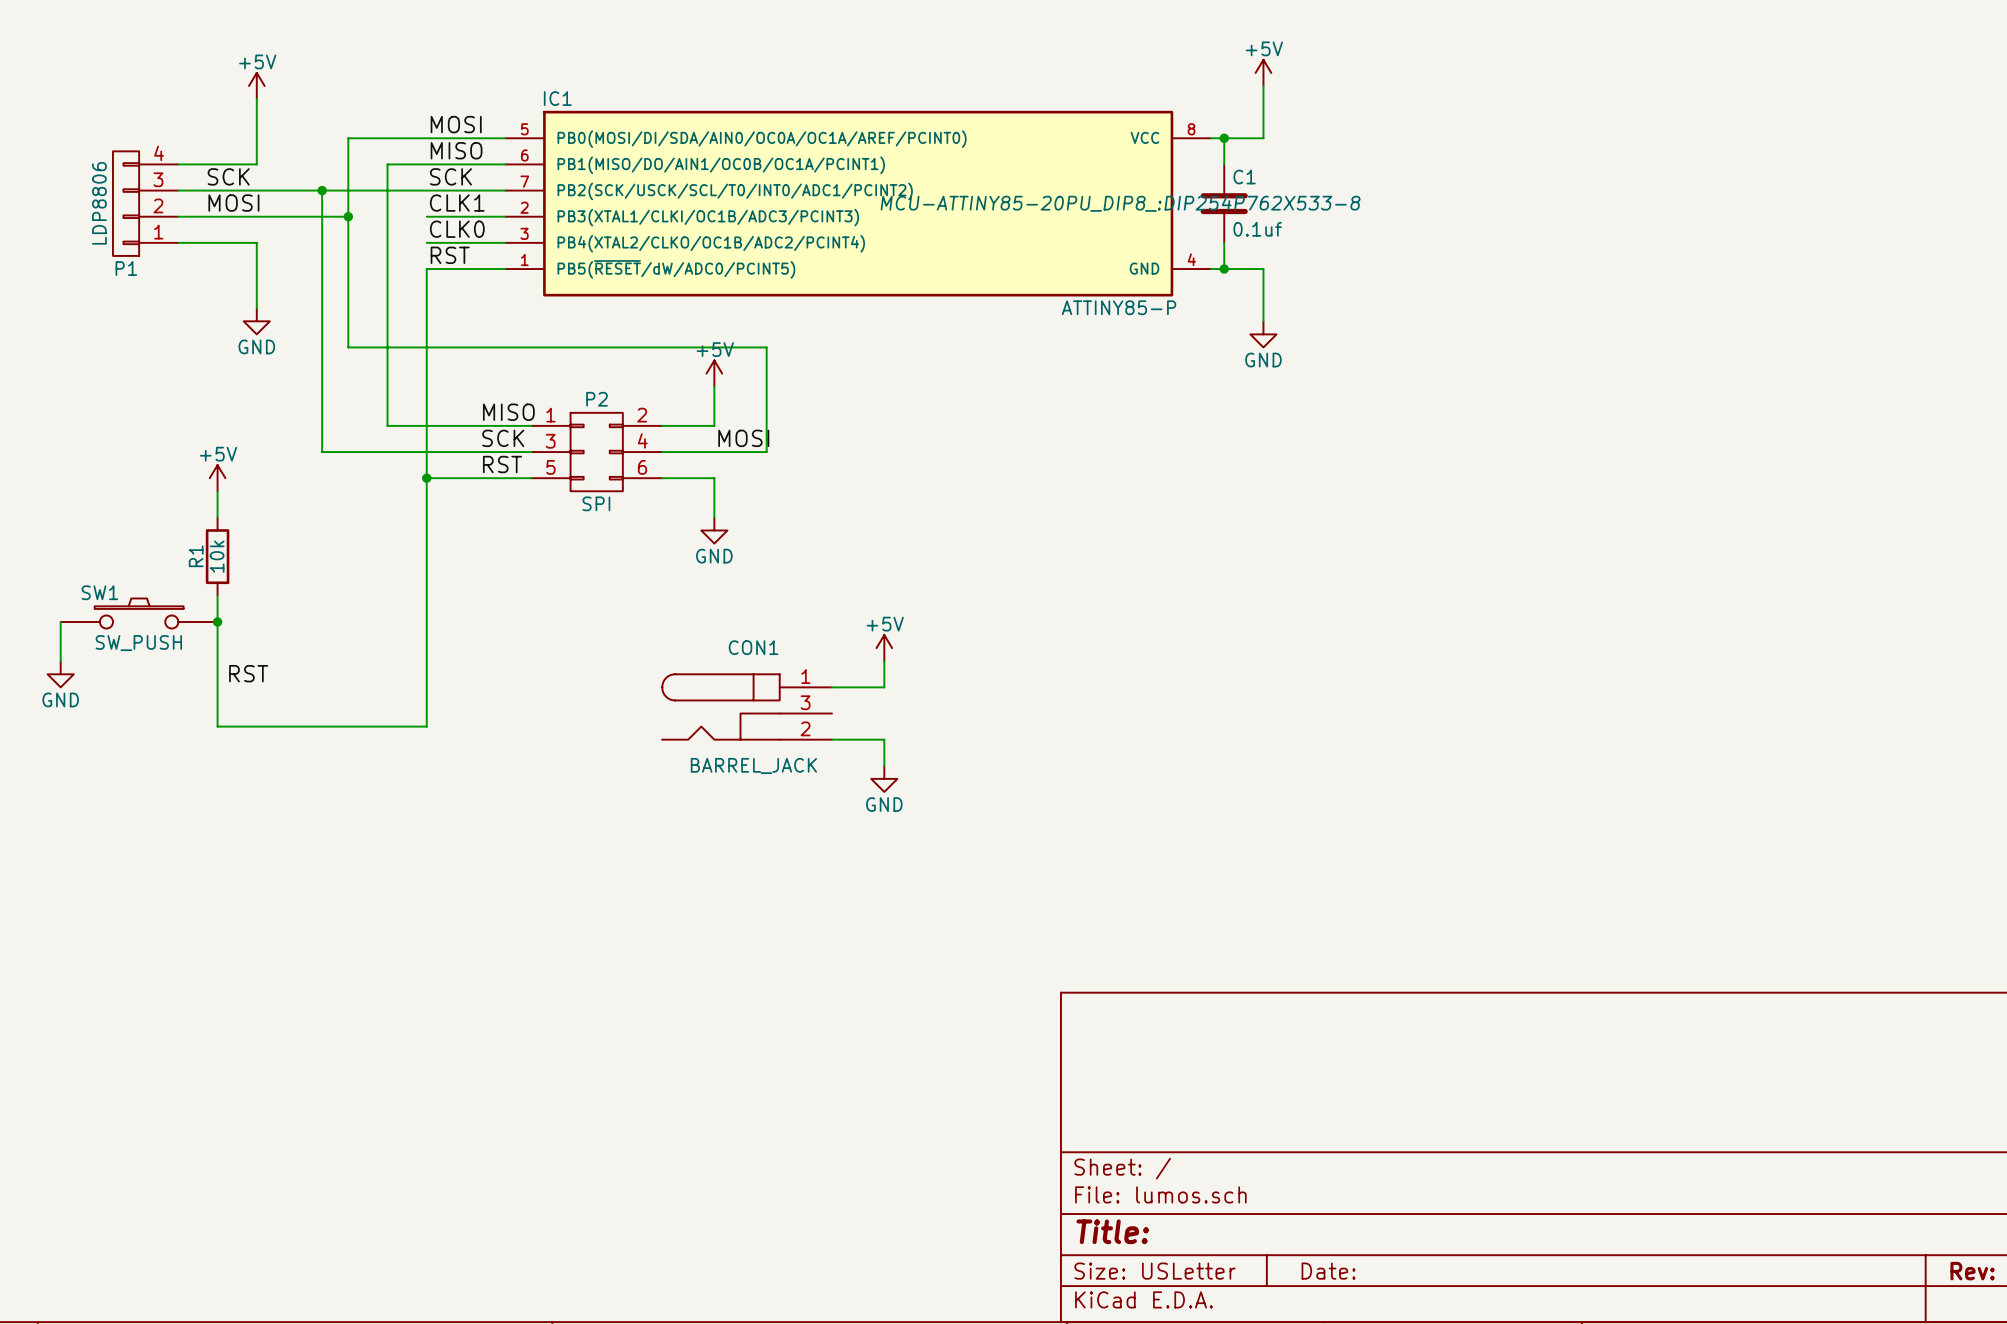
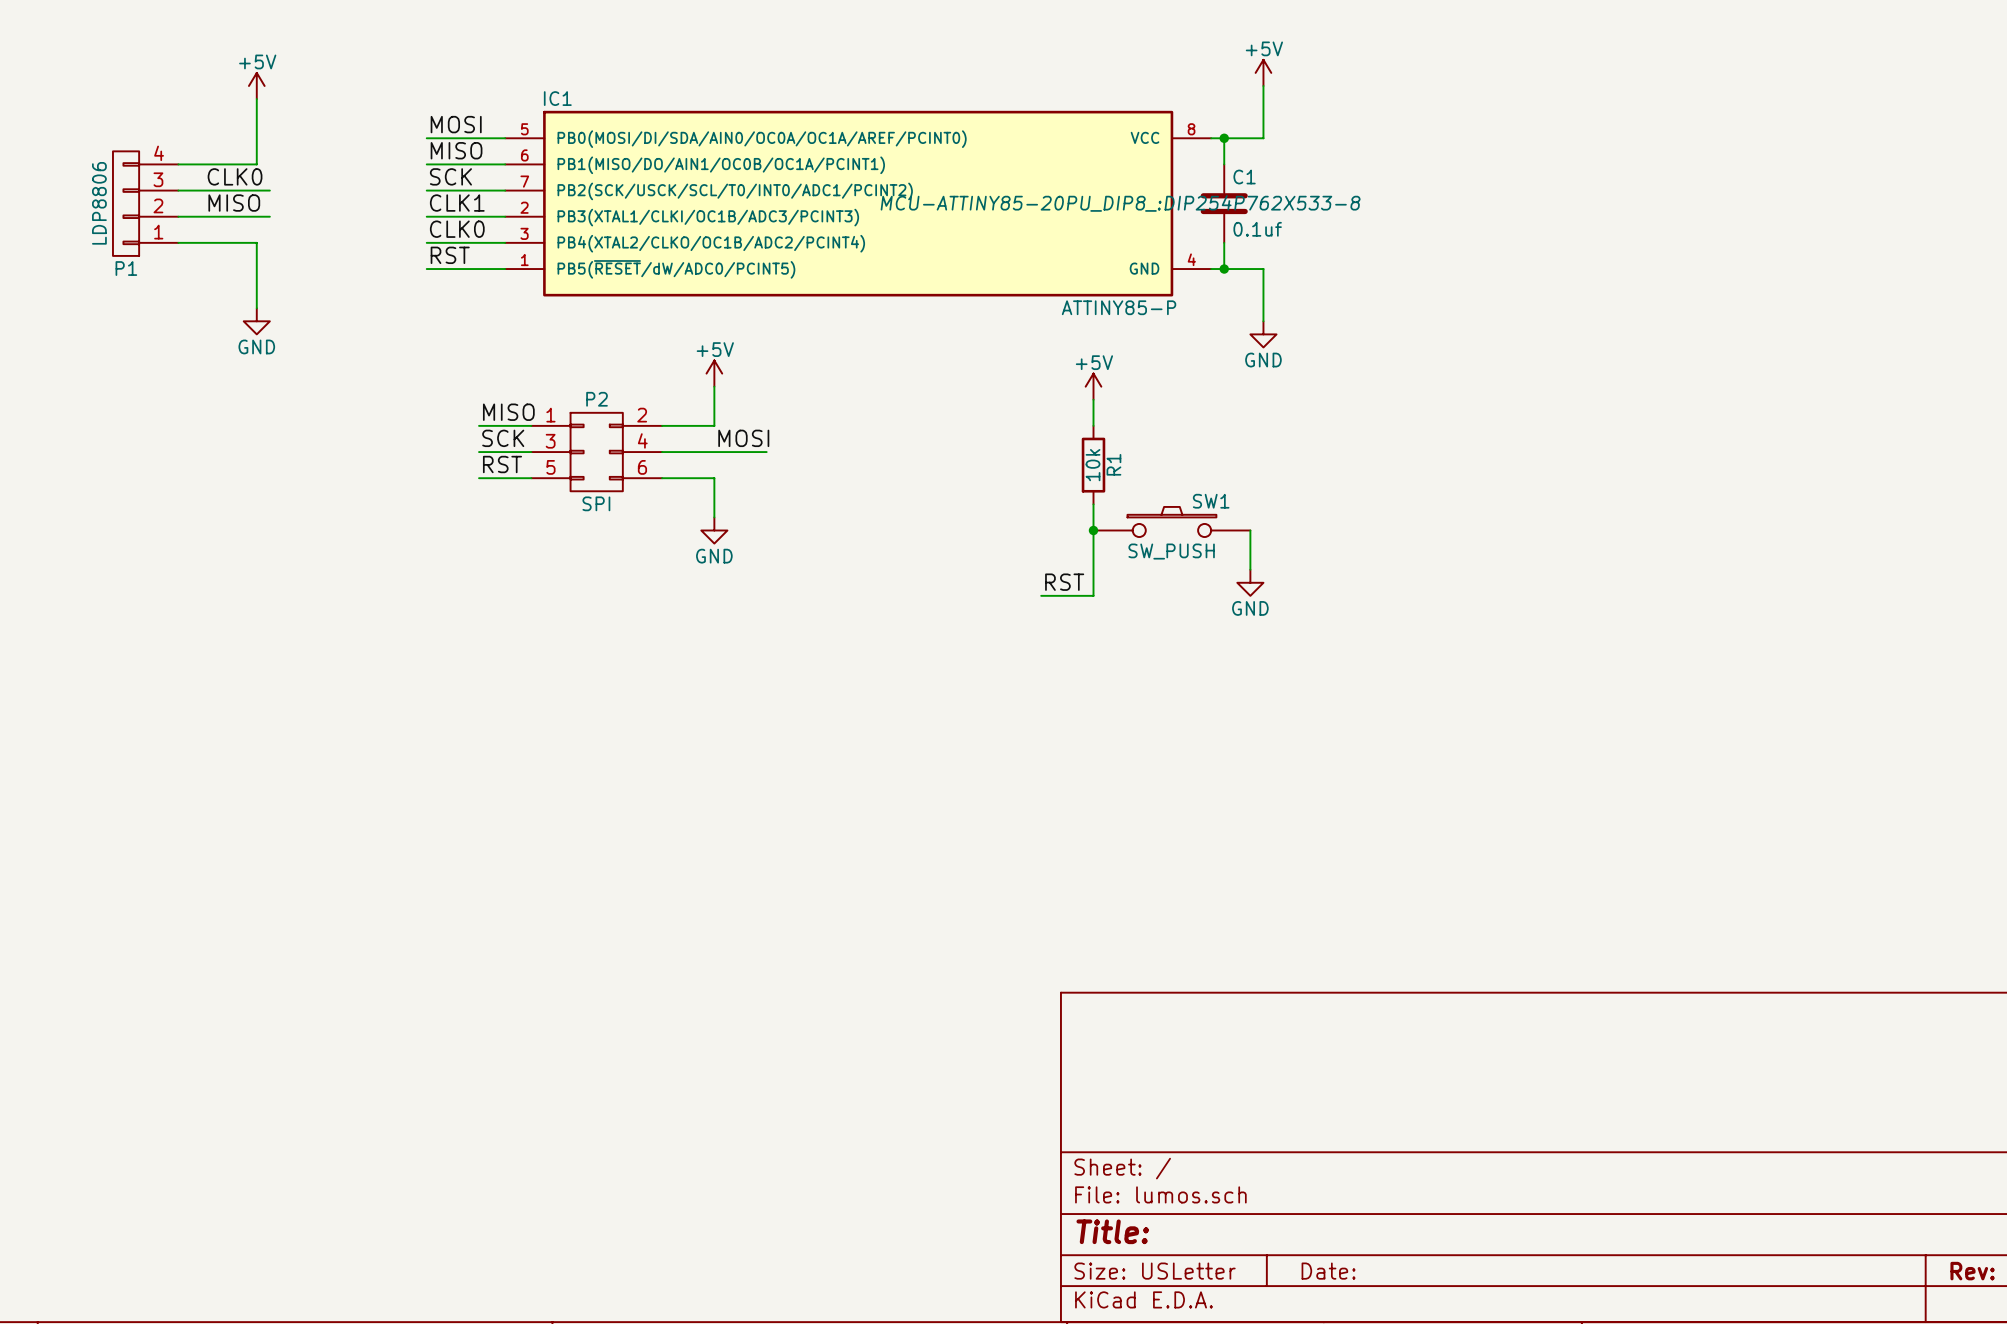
wire: (426, 138) (348, 138) (348, 347) (766, 347) (766, 452) -> none
wire: (426, 164) (387, 164) (387, 425) (479, 425) -> none
label: SCK (228, 176) -> CLK0 (235, 176)
wire: (269, 190) (426, 190) -> none
wire: (322, 190) (322, 452) (479, 452) -> none
junction: (322, 190) -> none
label: MOSI (233, 203) -> MISO (234, 203)
wire: (269, 216) (348, 216) -> none
junction: (348, 216) -> none
wire: (426, 269) (426, 726) (217, 726) (217, 595) -> none
power symbol: none -> +5V (1093, 386)
wire: none -> (1093, 399) (1093, 425)
power symbol: +5V (217, 478) -> none
wire: (426, 478) (479, 478) -> none
junction: (426, 478) -> none
wire: (217, 491) (217, 517) -> none
wire: none -> (1093, 504) (1093, 595) (1041, 595)
junction: none -> (1093, 530)
wire: none -> (1250, 530) (1250, 569)
R1 name position: R1 (196, 556) -> R1 (1113, 464)
R1 position: (217, 556) -> (1093, 465)
label: none -> RST (1064, 582)
power symbol: none -> GND (1250, 582)
SW1 name position: SW1 (99, 592) -> SW1 (1211, 501)
SW1 position: (139, 613) -> (1171, 521)
wire: (60, 622) (60, 661) -> none
junction: (217, 622) -> none
power symbol: +5V (884, 648) -> none
wire: (884, 661) (884, 687) (832, 687) -> none
label: RST (248, 673) -> none
power symbol: GND (60, 674) -> none
CON1: BARREL_JACK (747, 706) -> none
wire: (832, 739) (884, 739) (884, 765) -> none
power symbol: GND (884, 778) -> none

